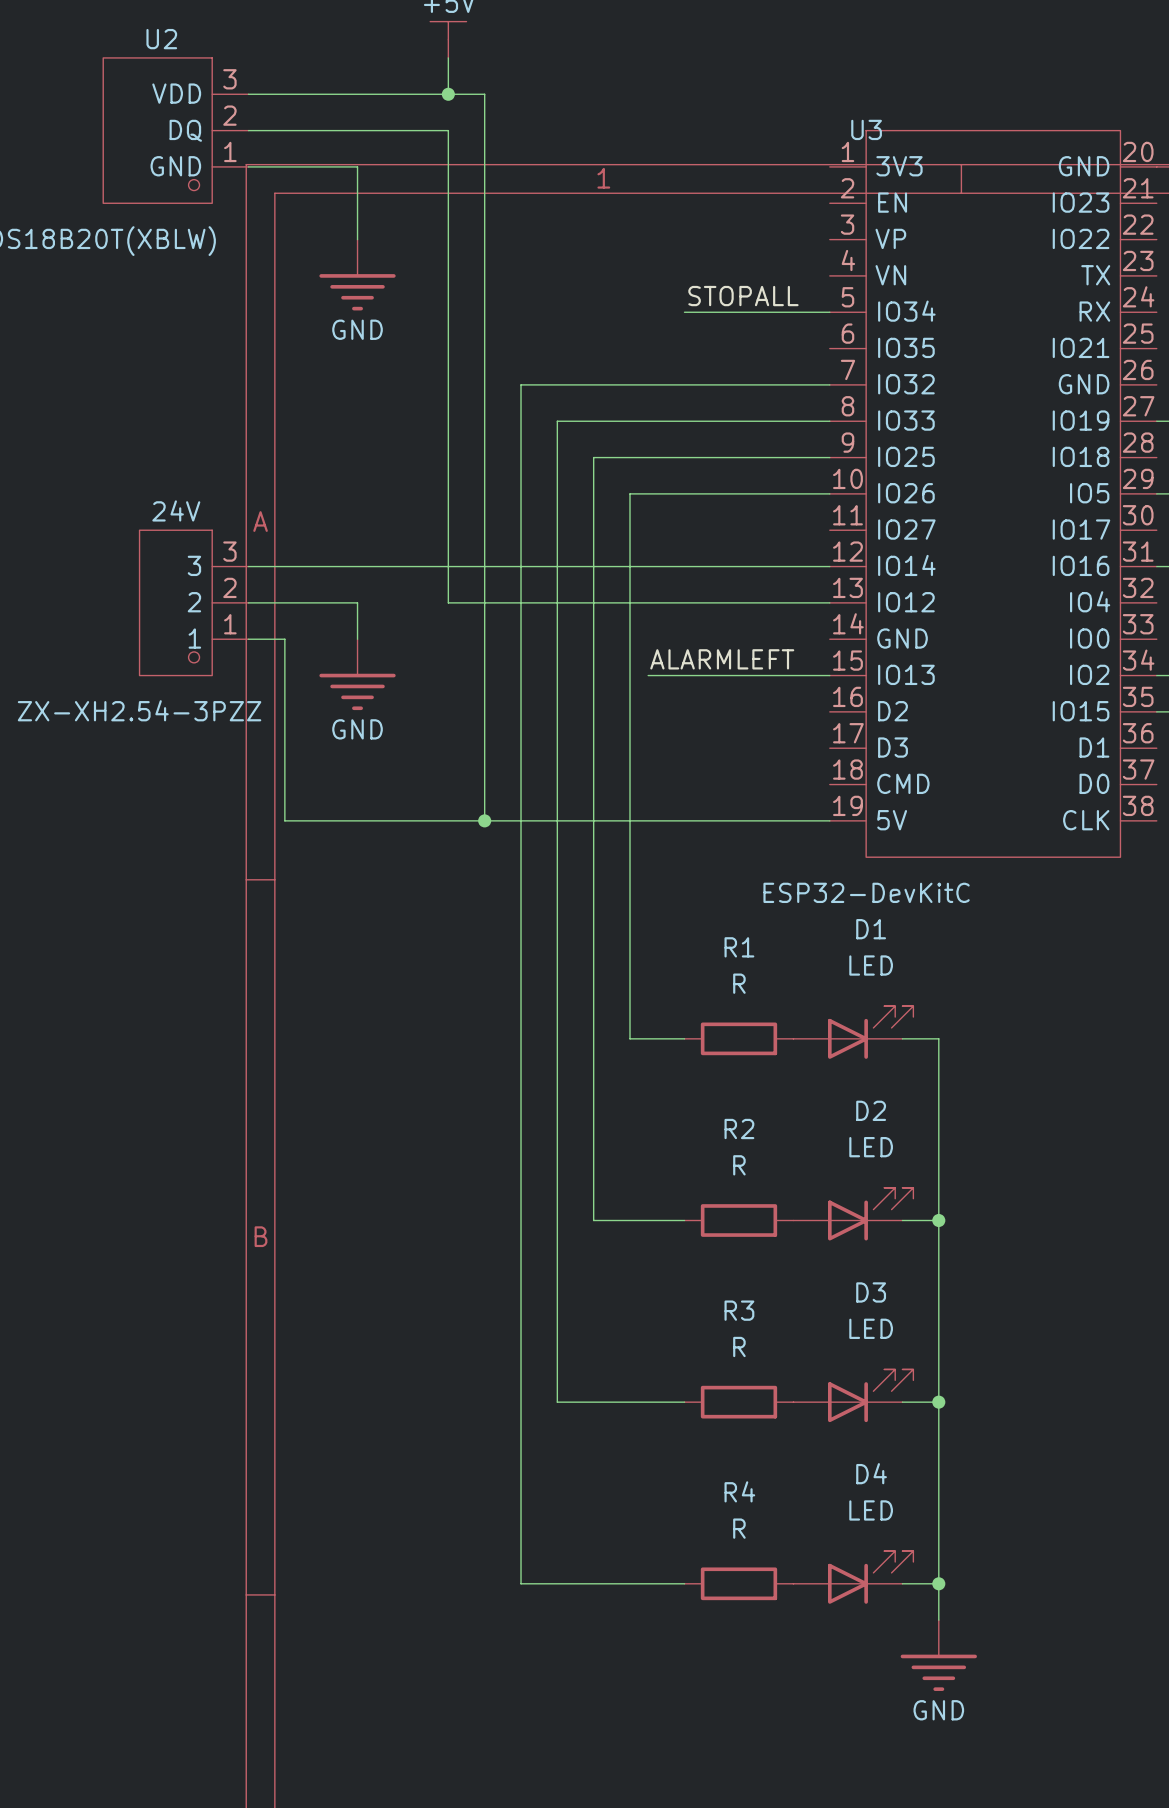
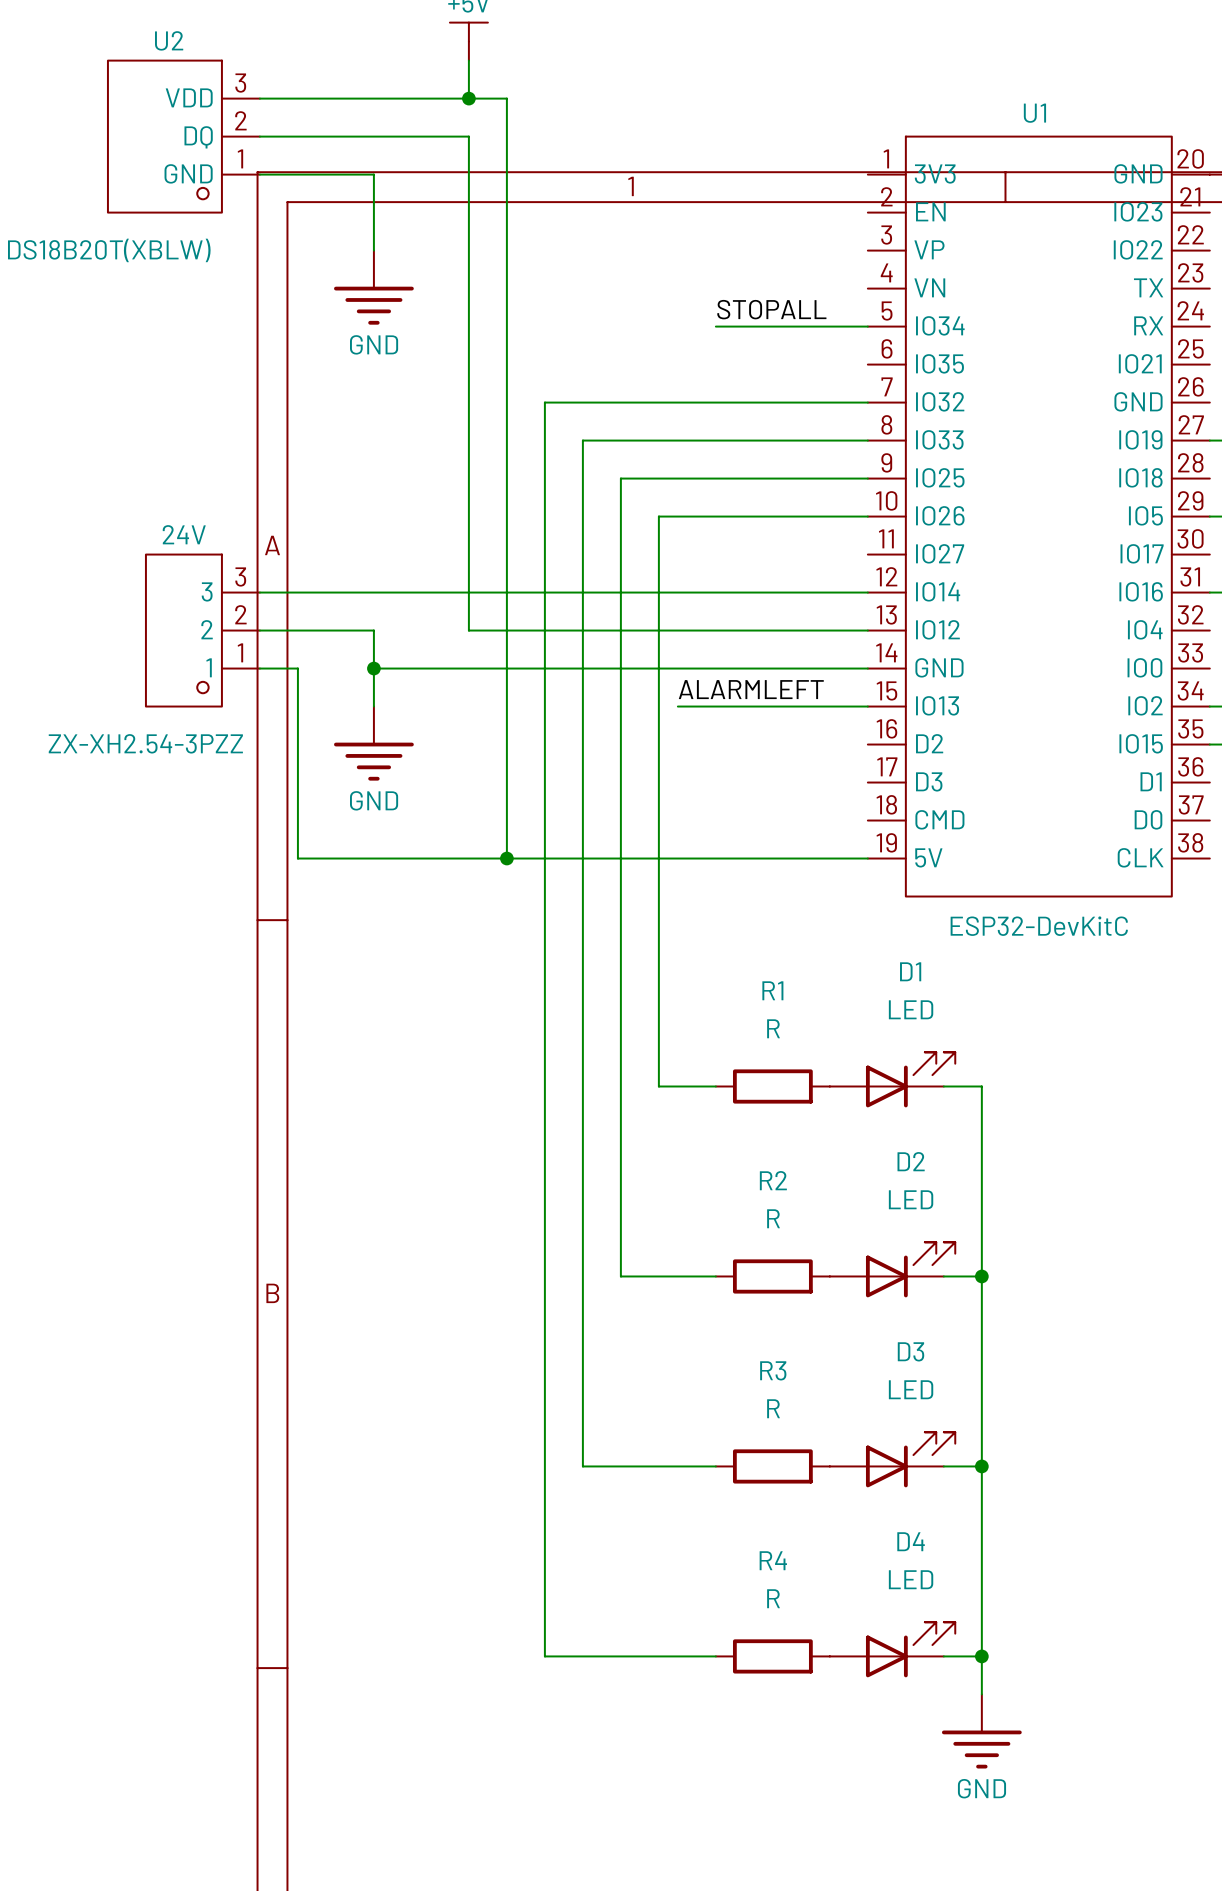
U3 name: U3 (866, 129) -> U1 (1034, 113)
junction: none -> (373, 668)
wire: none -> (867, 668) (373, 668) (373, 706)
power symbol position: GND (357, 674) -> GND (373, 743)
U3 value position: ESP32-DevKitC (866, 892) -> ESP32-DevKitC (1039, 926)

